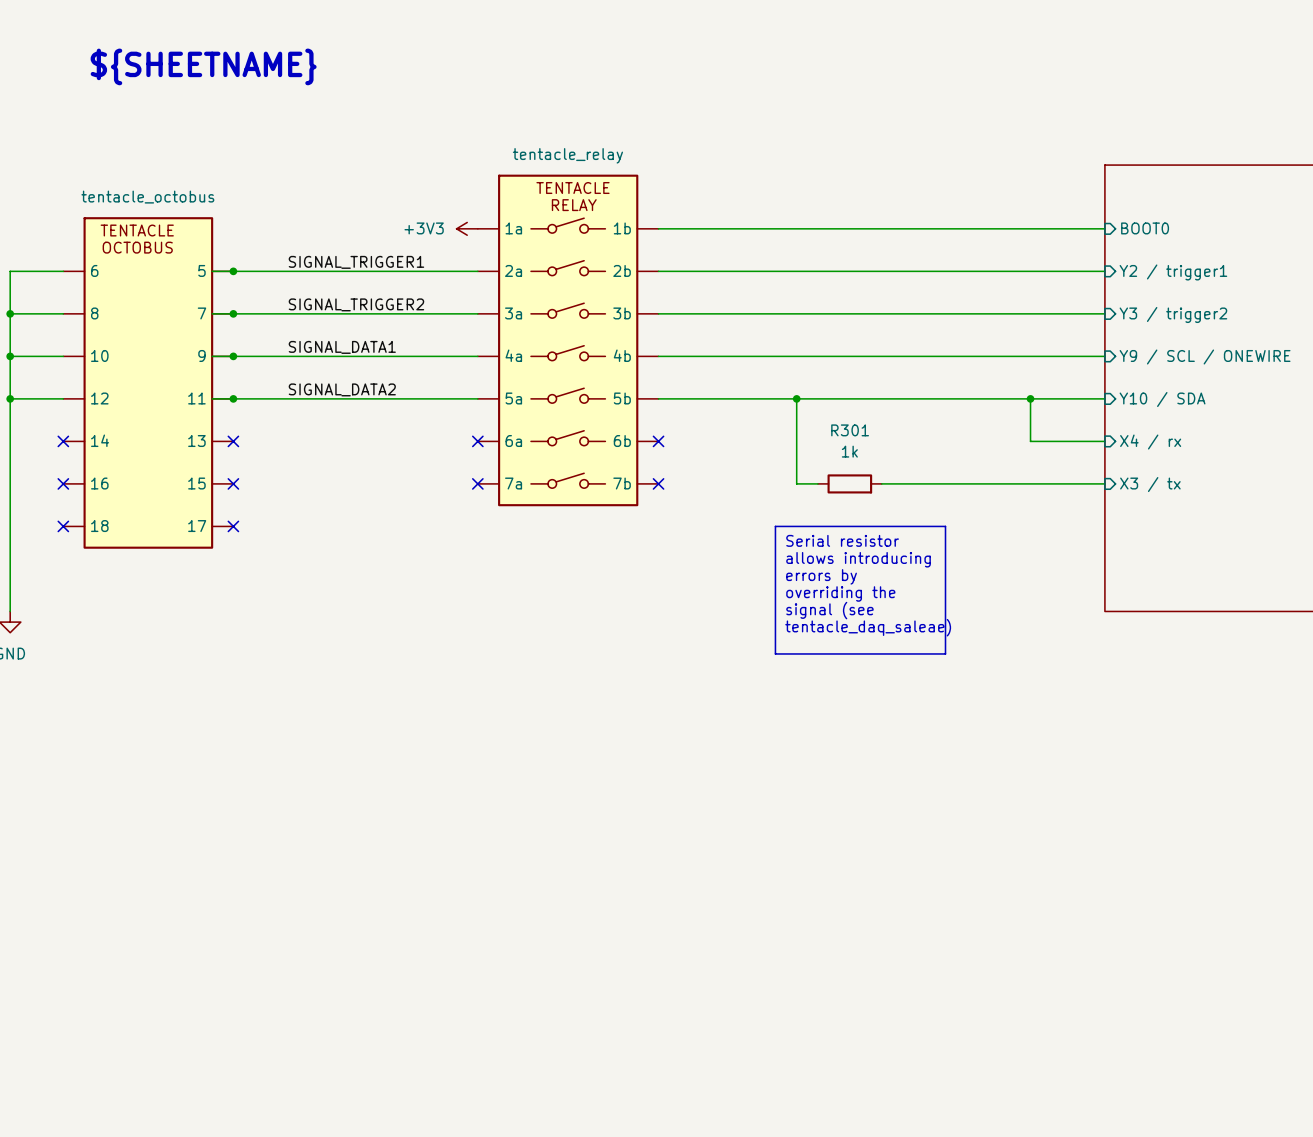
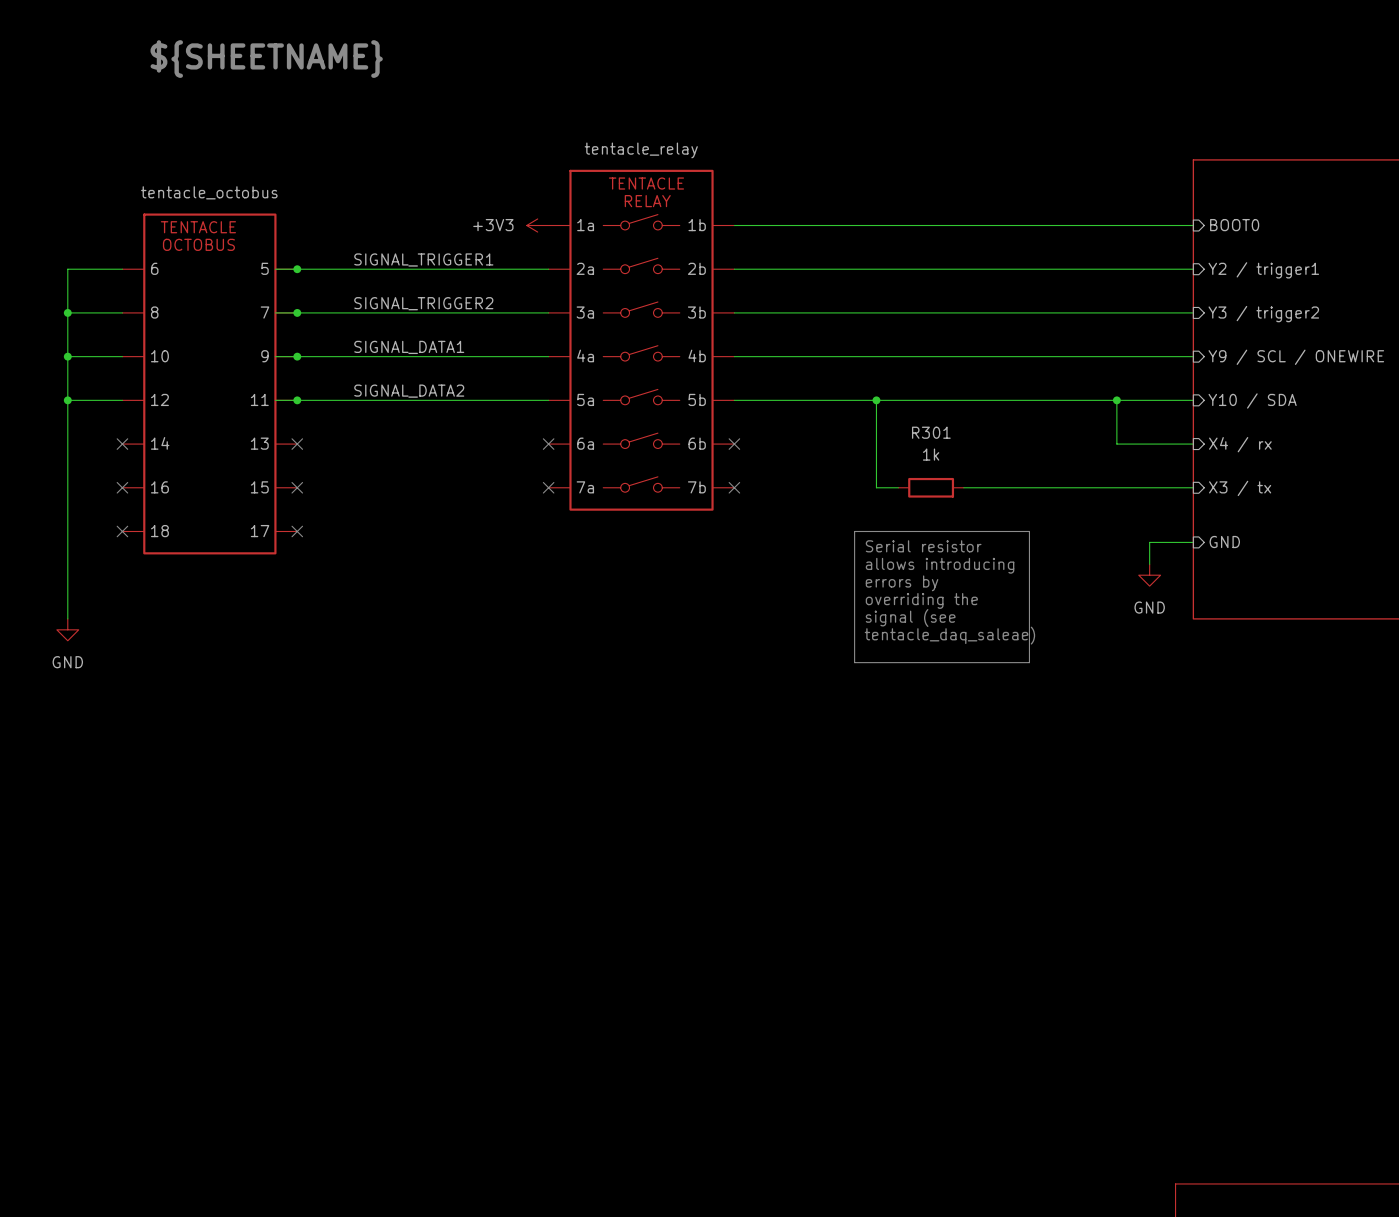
sheet pin: none -> GND (1224, 542)
wire: none -> (1193, 542) (1149, 542) (1149, 564)
power symbol: none -> GND (1149, 575)

